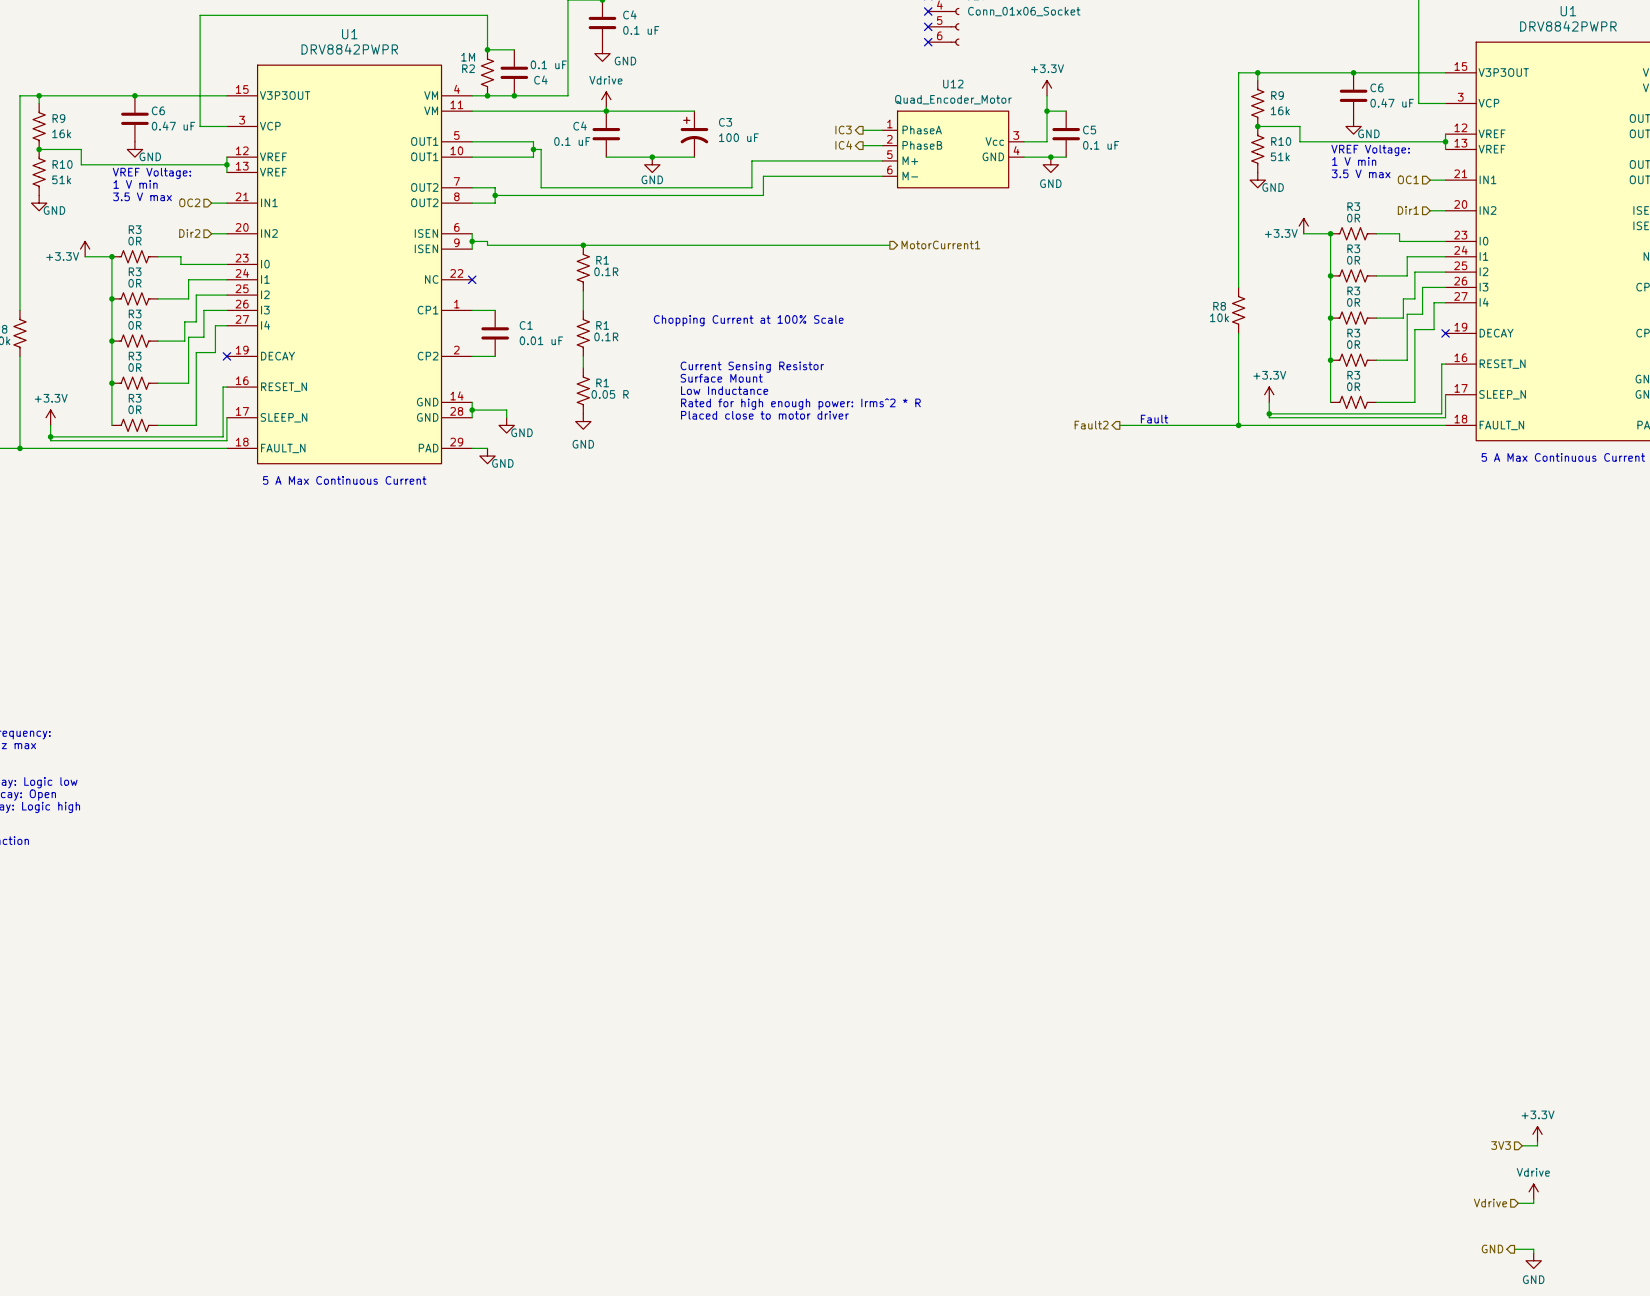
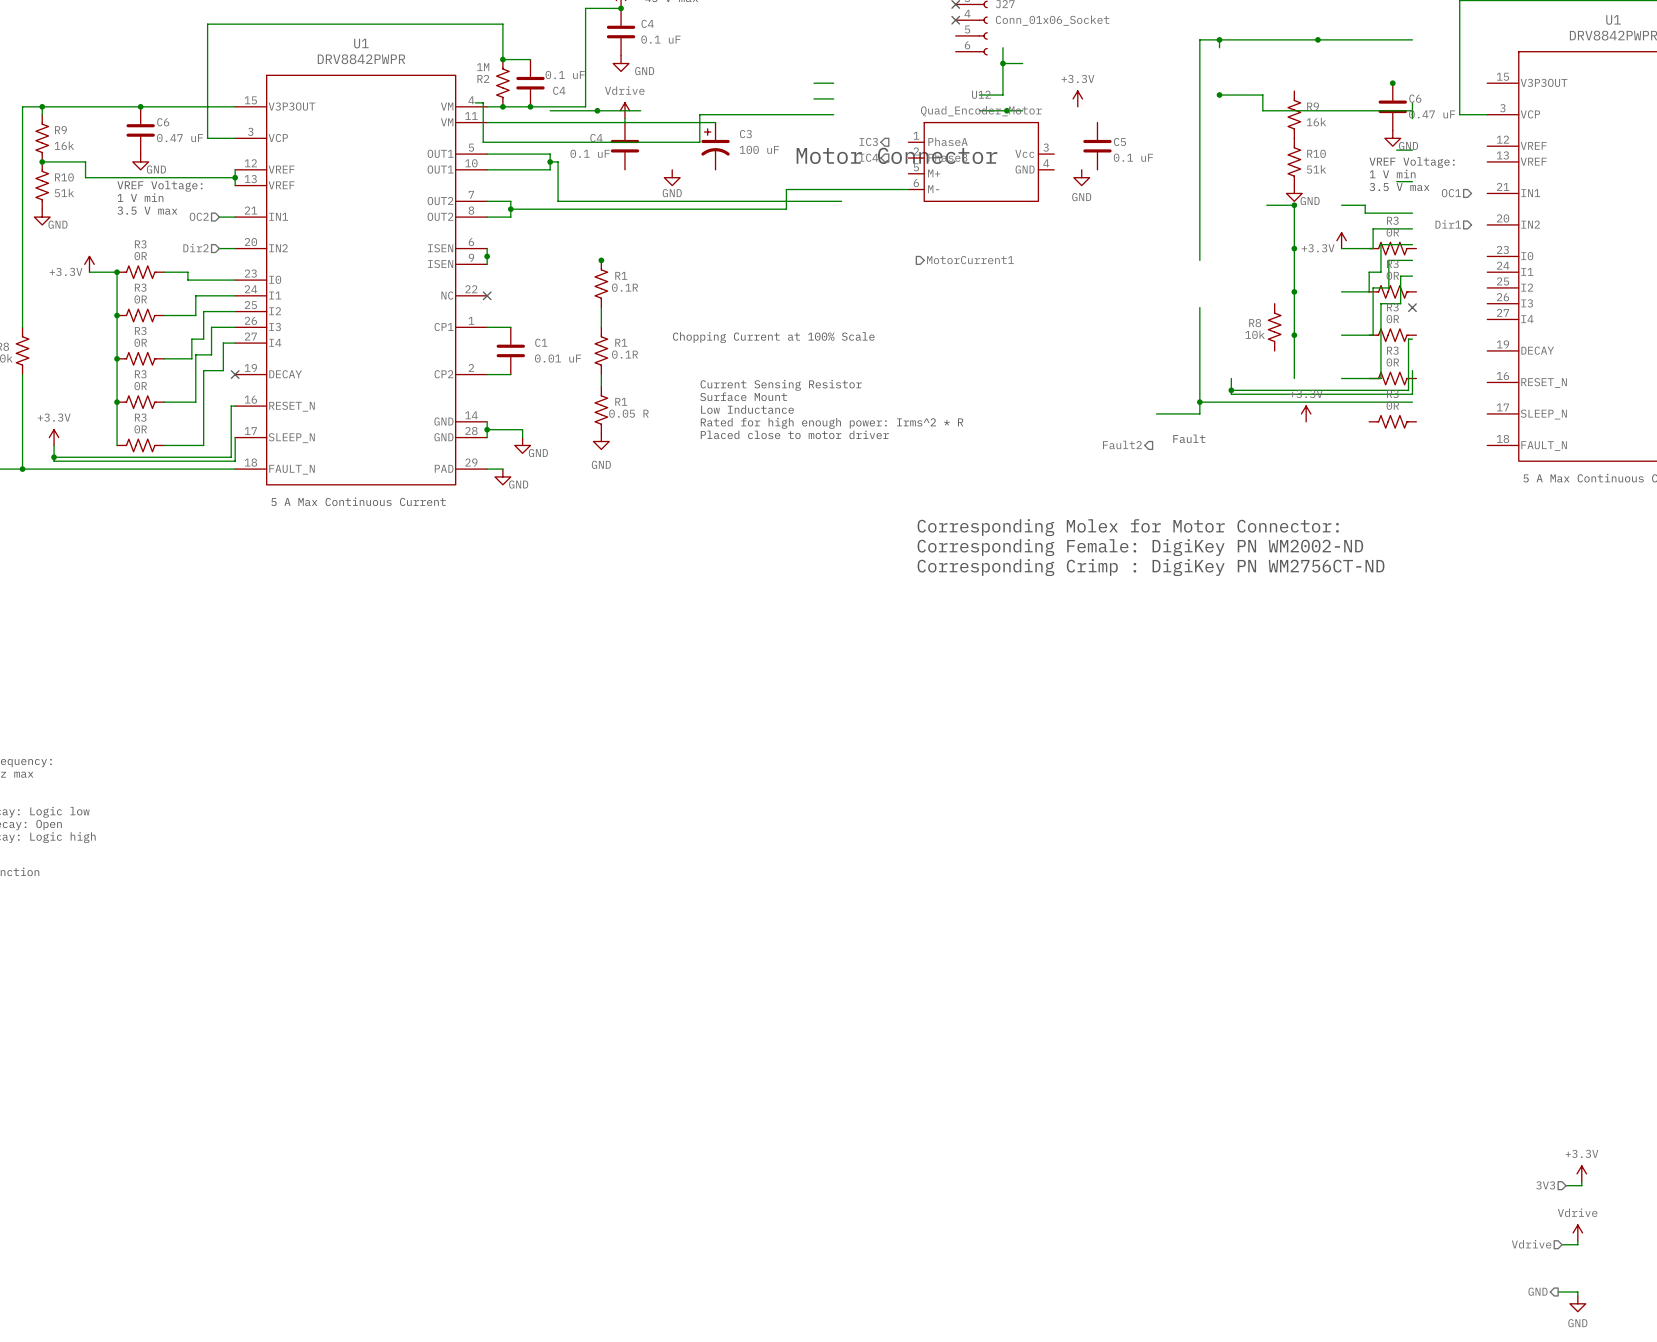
no-connect mark: (928, 26) -> none
junction: none -> (1219, 39)
junction: none -> (1317, 39)
no-connect mark: (928, 42) -> none
junction: none -> (1002, 63)
wire: (1257, 72) (1257, 80) -> (1219, 39) (1219, 47)
junction: (1257, 72) -> none
wire: (1445, 72) (1238, 72) (1238, 287) -> (1412, 39) (1199, 39) (1199, 260)
junction: none -> (1219, 95)
wire: none -> (475, 102) (483, 102) (483, 142) (699, 142) (699, 114) (833, 114)
wire: (1047, 95) (1047, 141) (1024, 141) -> (1002, 47) (1002, 95) (979, 95)
junction: none -> (1006, 110)
junction position: (606, 111) -> (597, 110)
wire: (1047, 111) (1066, 111) -> (1002, 63) (1022, 63)
junction: (1047, 111) -> none
wire: (1257, 126) (1299, 126) (1299, 141) (1445, 141) -> (1219, 95) (1262, 95) (1262, 110) (1412, 110)
junction: (1257, 126) -> none
wire: (863, 130) (882, 130) -> (813, 98) (833, 98)
wire: (1445, 134) (1445, 149) -> (1412, 102) (1412, 118)
junction: (1445, 141) -> none
text: none -> Motor Connector (896, 155)
wire: (863, 145) (882, 145) -> (813, 83) (833, 83)
wire: (606, 157) (694, 157) -> (550, 110) (640, 110)
junction: (652, 157) -> none
wire: (1024, 157) (1066, 157) -> (979, 110) (1022, 110)
junction: (1050, 157) -> none
wire: (882, 160) (751, 160) (751, 187) -> (841, 201) (774, 201)
wire: (1430, 180) (1445, 180) -> (1396, 150) (1412, 150)
wire: none -> (1266, 205) (1294, 205) (1294, 378)
junction: none -> (1294, 205)
wire: (1430, 210) (1445, 210) -> (1396, 181) (1412, 181)
wire: none -> (1412, 228) (1373, 228) (1373, 248) (1369, 248)
junction: none -> (1294, 248)
wire: (1330, 233) (1330, 256) -> (1412, 244) (1380, 244) (1380, 272) (1369, 272)
junction: (1330, 233) -> none
wire: (1376, 233) (1399, 233) (1399, 241) (1445, 241) -> (1341, 205) (1365, 205) (1365, 213) (1412, 213)
wire: (472, 241) (487, 241) (487, 245) (889, 245) -> none
wire: (1445, 256) (1407, 256) (1407, 275) (1376, 275) -> none
wire: (1445, 272) (1414, 272) (1414, 298) (1403, 298) (1403, 318) (1376, 318) -> none
junction: none -> (1294, 291)
wire: (1330, 275) (1330, 402) -> (1369, 291) (1341, 291)
junction: (1330, 275) -> none
wire: (1445, 287) (1422, 287) (1422, 314) (1407, 314) (1407, 360) (1376, 360) -> (1412, 260) (1388, 260) (1388, 287) (1373, 287) (1373, 335) (1341, 335)
wire: none -> (1199, 307) (1199, 413) (1156, 413)
no-connect mark: none -> (1412, 307)
wire: (1445, 302) (1434, 302) (1434, 329) (1414, 329) (1414, 402) (1376, 402) -> (1412, 276) (1400, 276) (1400, 303) (1380, 303) (1380, 378) (1341, 378)
junction: none -> (1294, 335)
junction: (1330, 318) -> none
wire: (1238, 333) (1238, 425) -> none
no-connect mark: (1445, 333) -> none
junction: (1330, 360) -> none
wire: (1445, 364) (1441, 364) (1441, 413) (1269, 413) -> (1412, 339) (1408, 339) (1408, 390) (1231, 390)
junction: none -> (1231, 390)
wire: none -> (1199, 402) (1412, 402)
junction: none -> (1199, 402)
wire: (1445, 394) (1445, 417) (1269, 417) (1269, 402) -> (1412, 370) (1412, 394) (1231, 394) (1231, 378)
junction: (1269, 413) -> none
wire: (1119, 425) (1445, 425) -> none
junction: (1238, 425) -> none
text: none -> Corresponding Molex for Motor Connector: (1128, 527)
text: none -> Corresponding Female: DigiKey PN WM2002-ND (1140, 547)
text: none -> Corresponding Crimp : DigiKey PN WM2756CT-ND (1151, 567)

